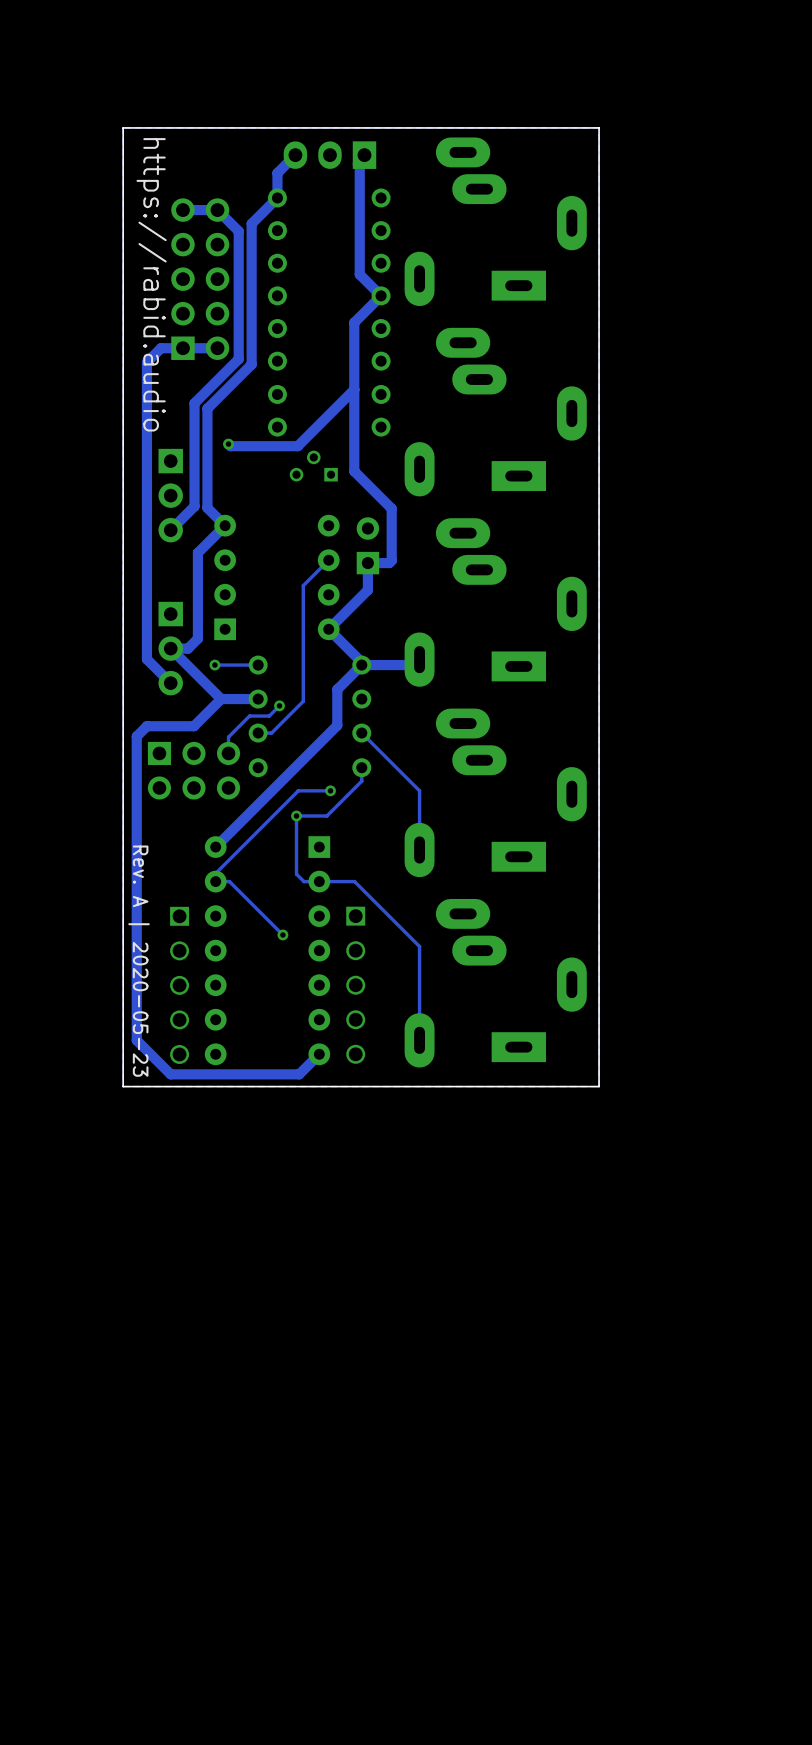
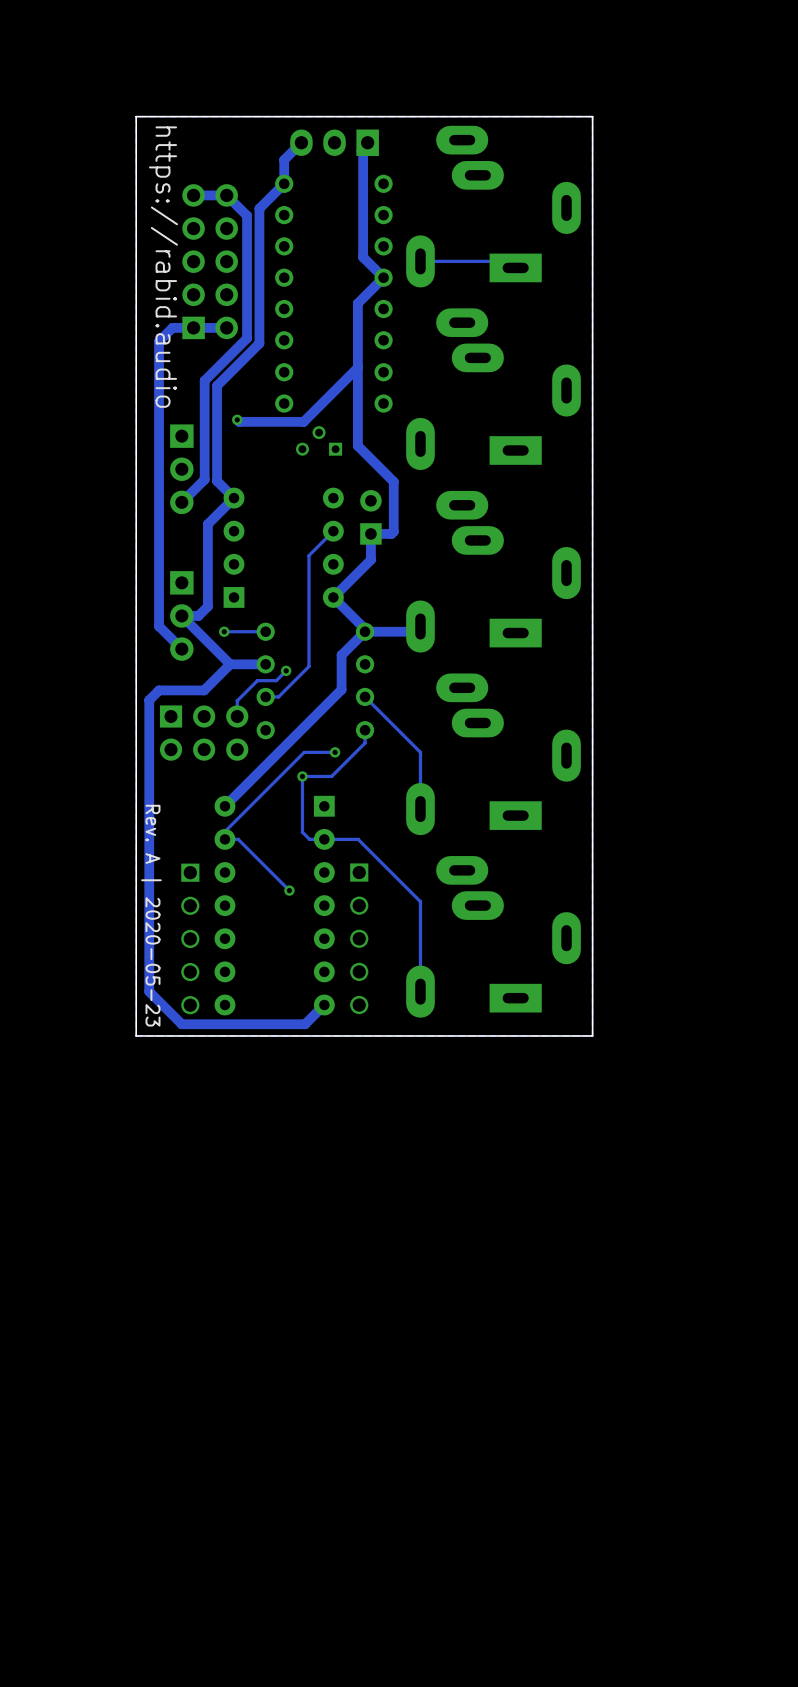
track: none -> (420, 261) (509, 261) (515, 267)

